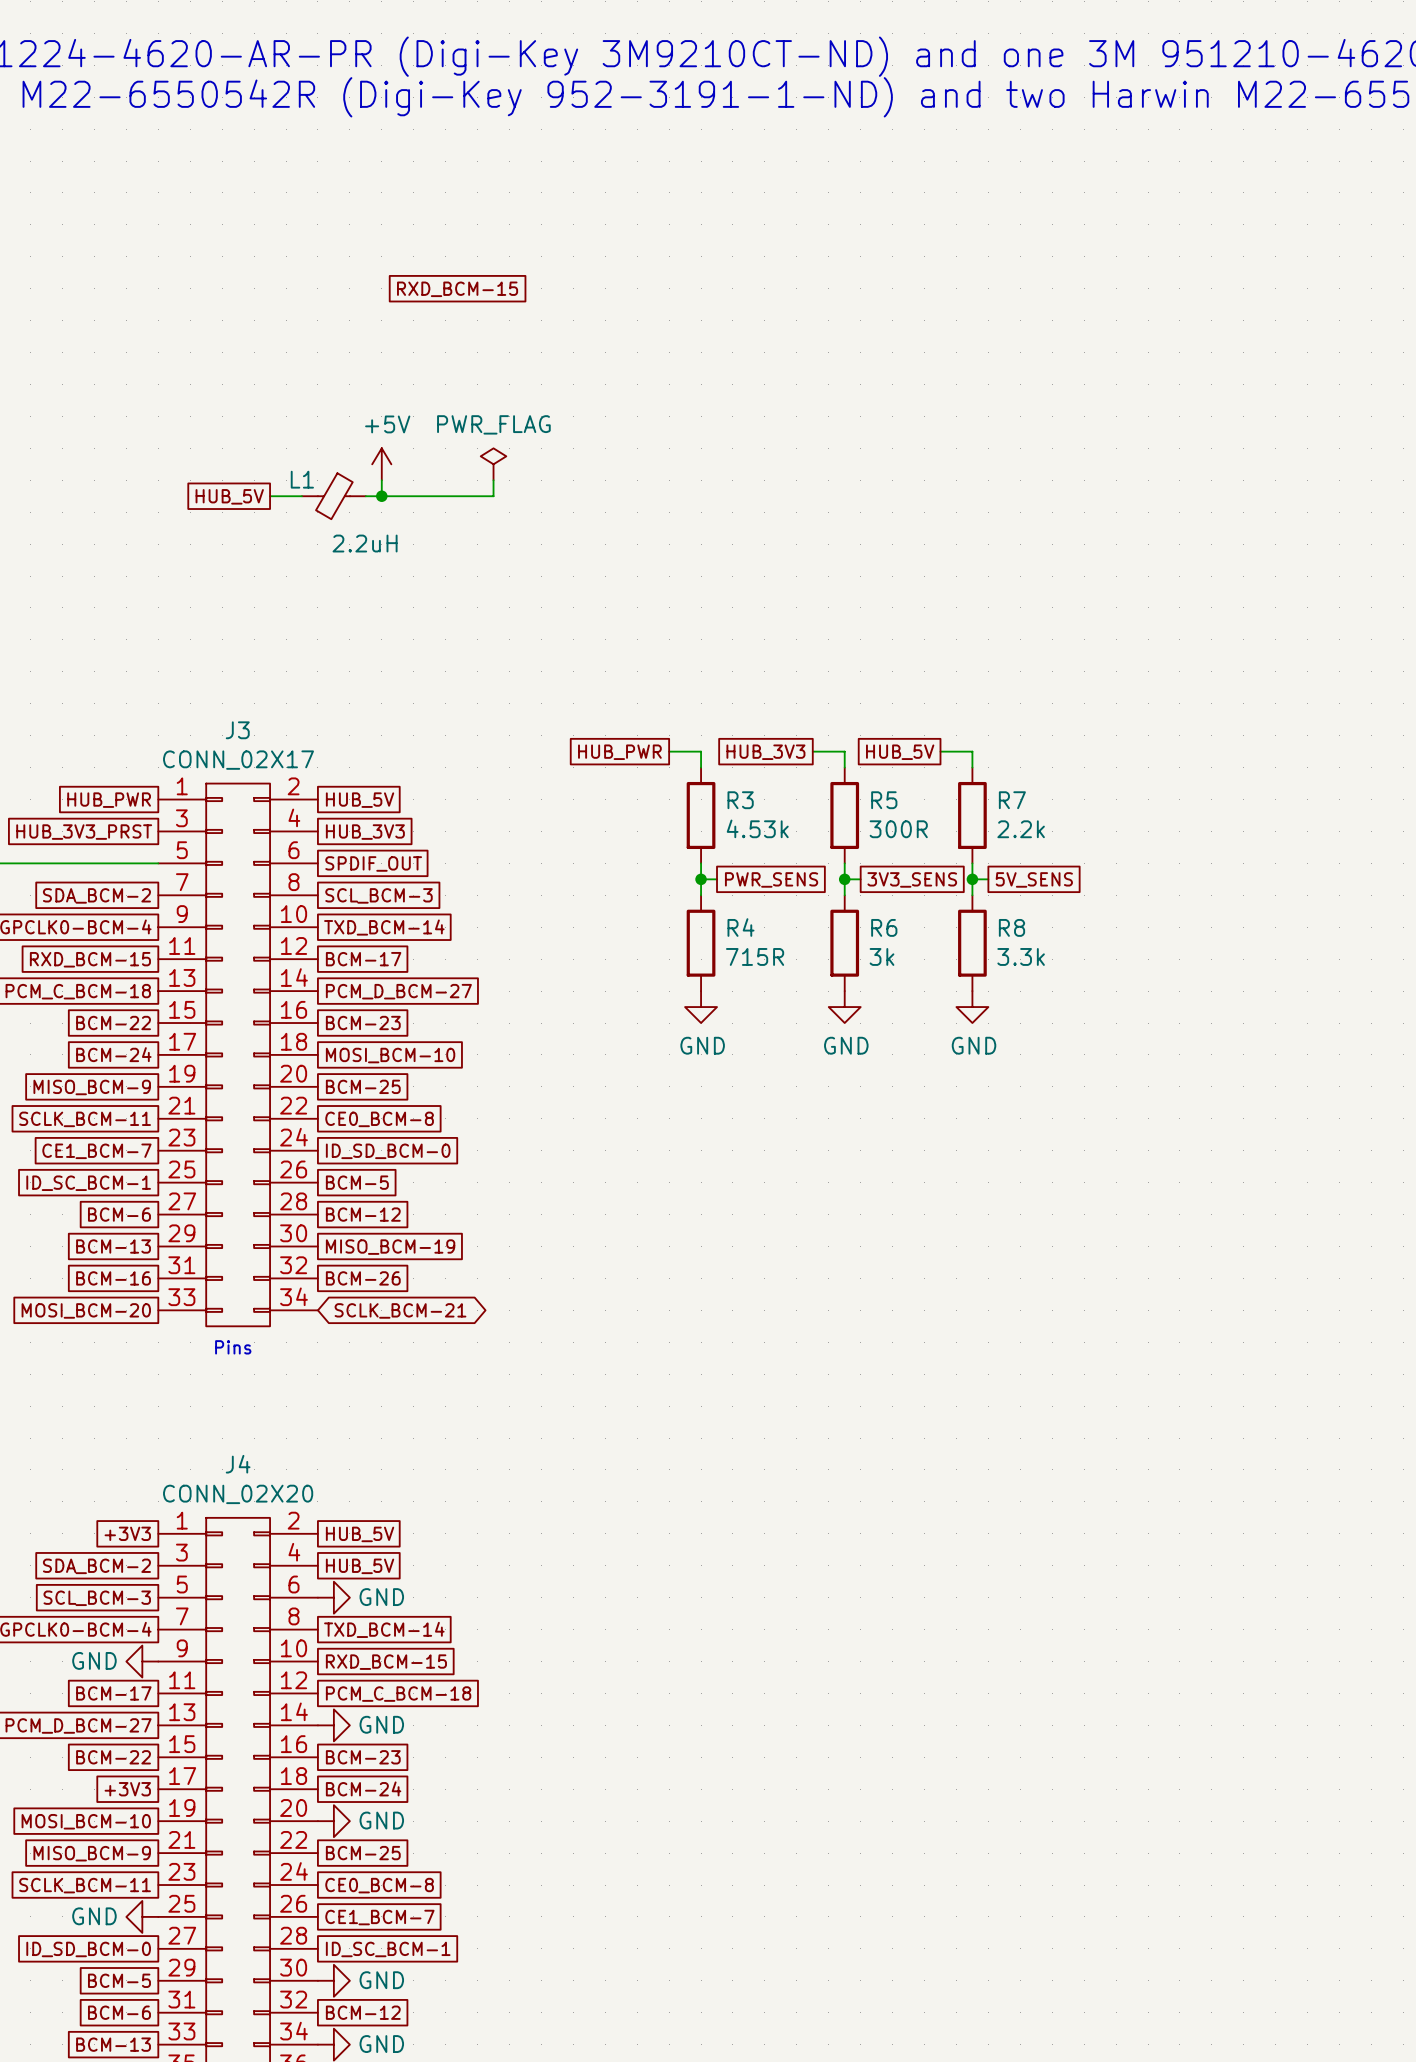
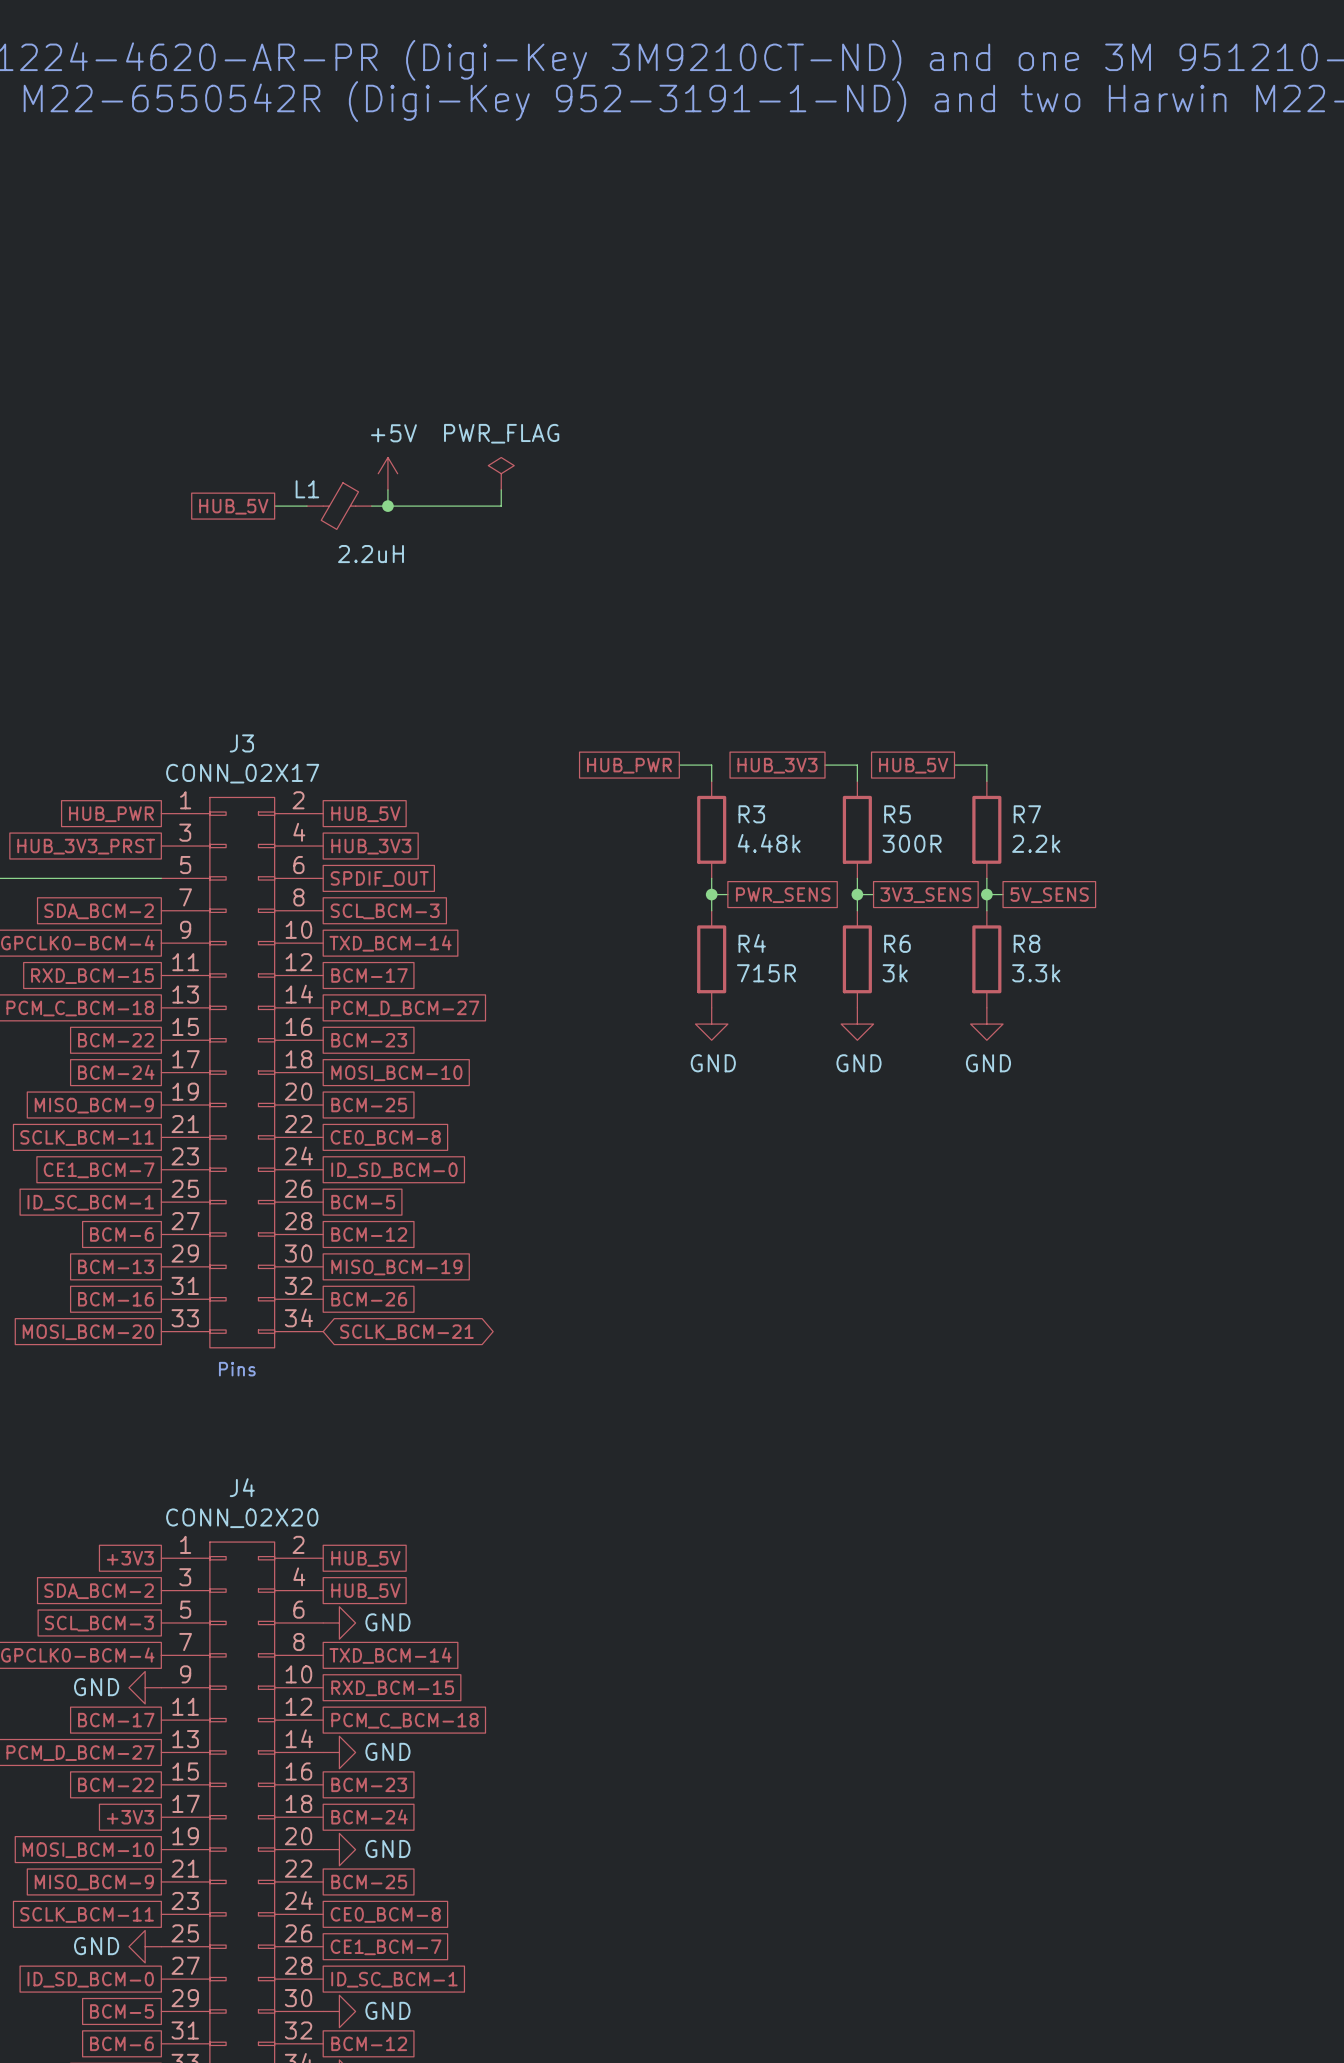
global label: RXD_BCM-15 (457, 289) -> none
R3 value: 4.53k (757, 828) -> 4.48k (769, 843)

